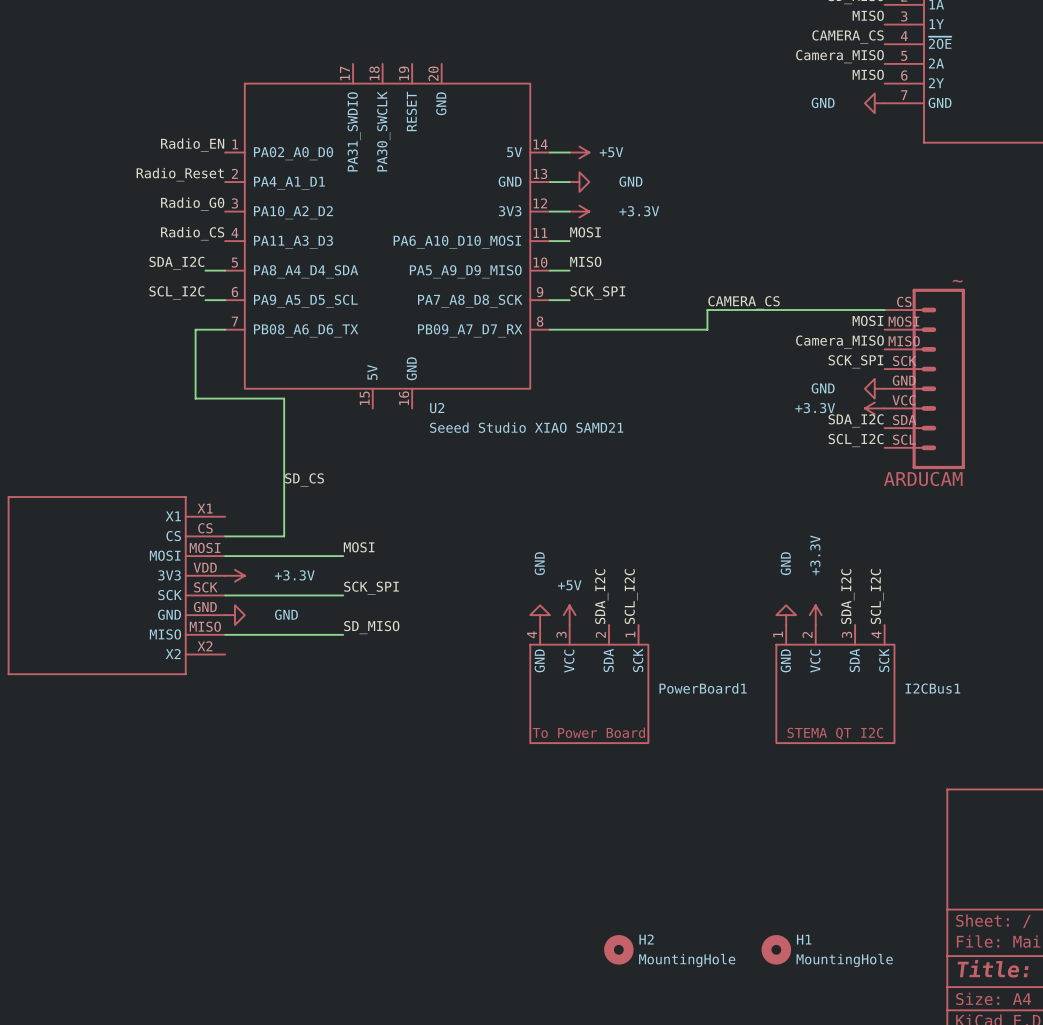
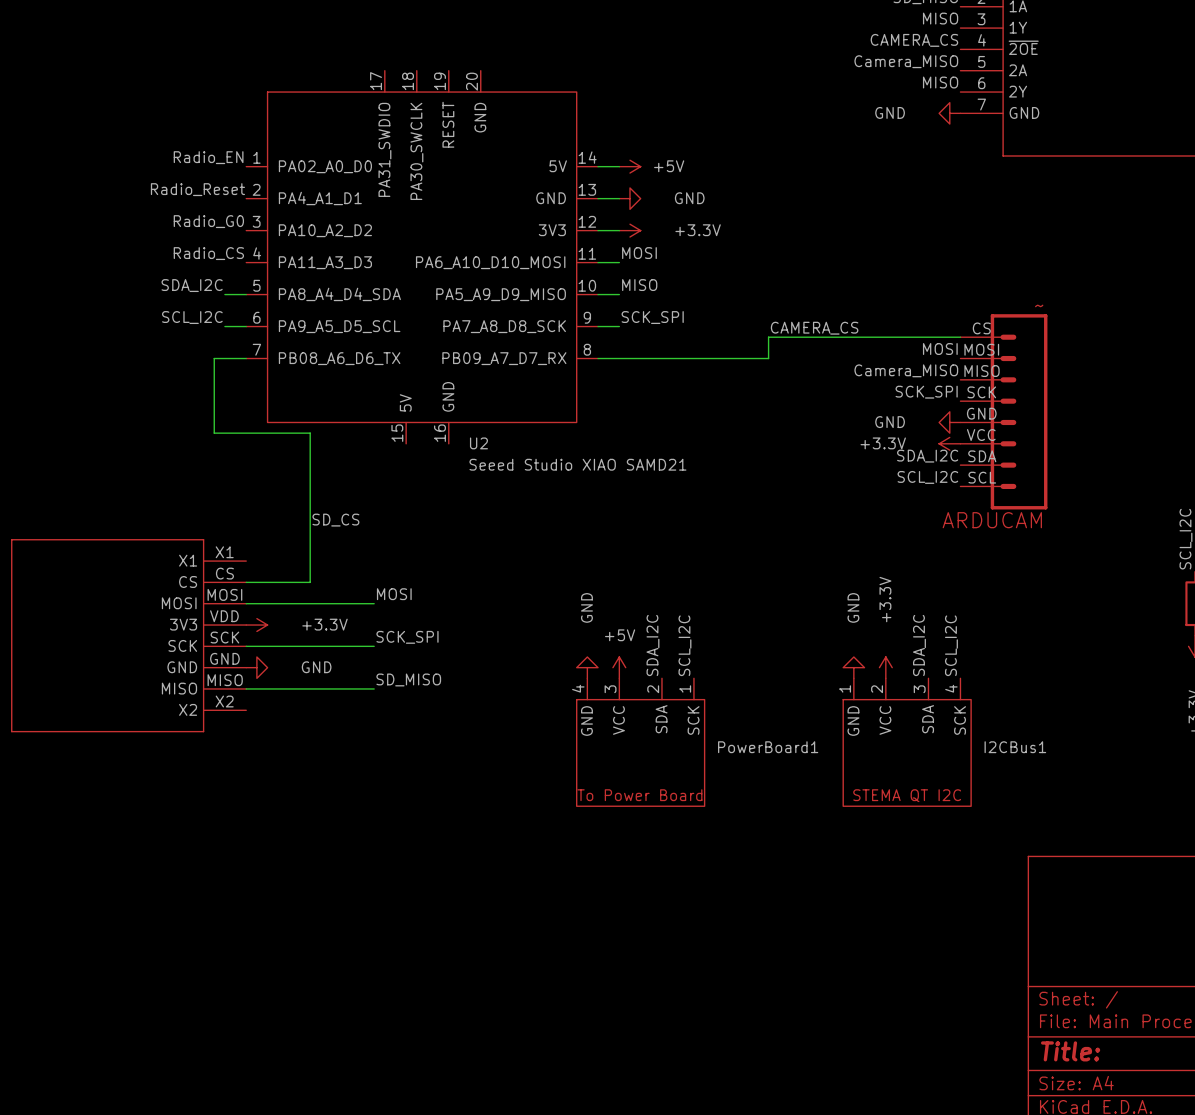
H2: MountingHole (618, 949) -> none
H1: MountingHole (776, 949) -> none

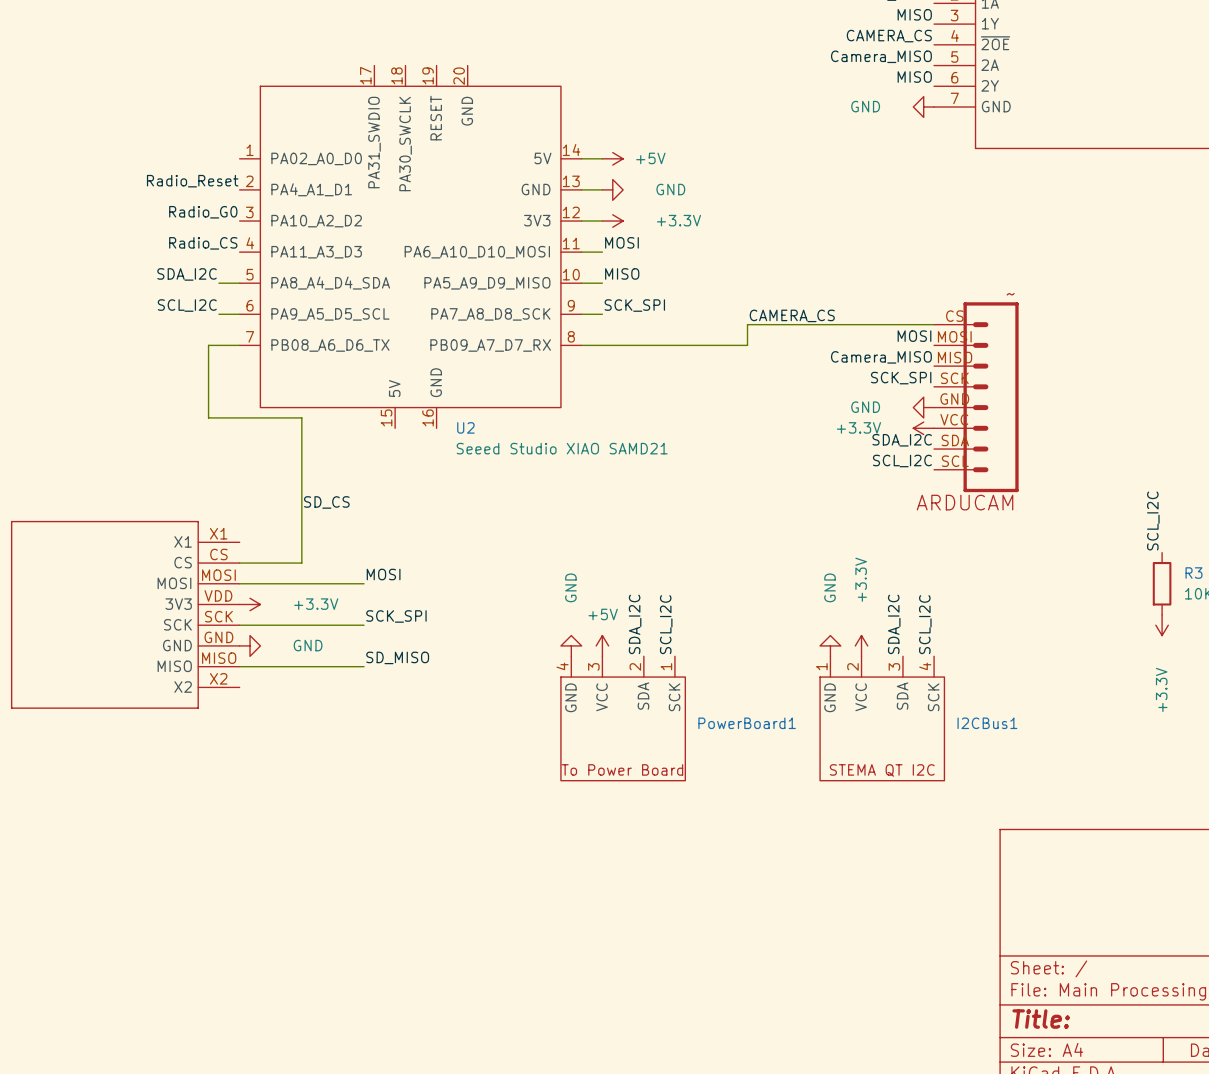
label: Radio_EN (208, 157) -> none

